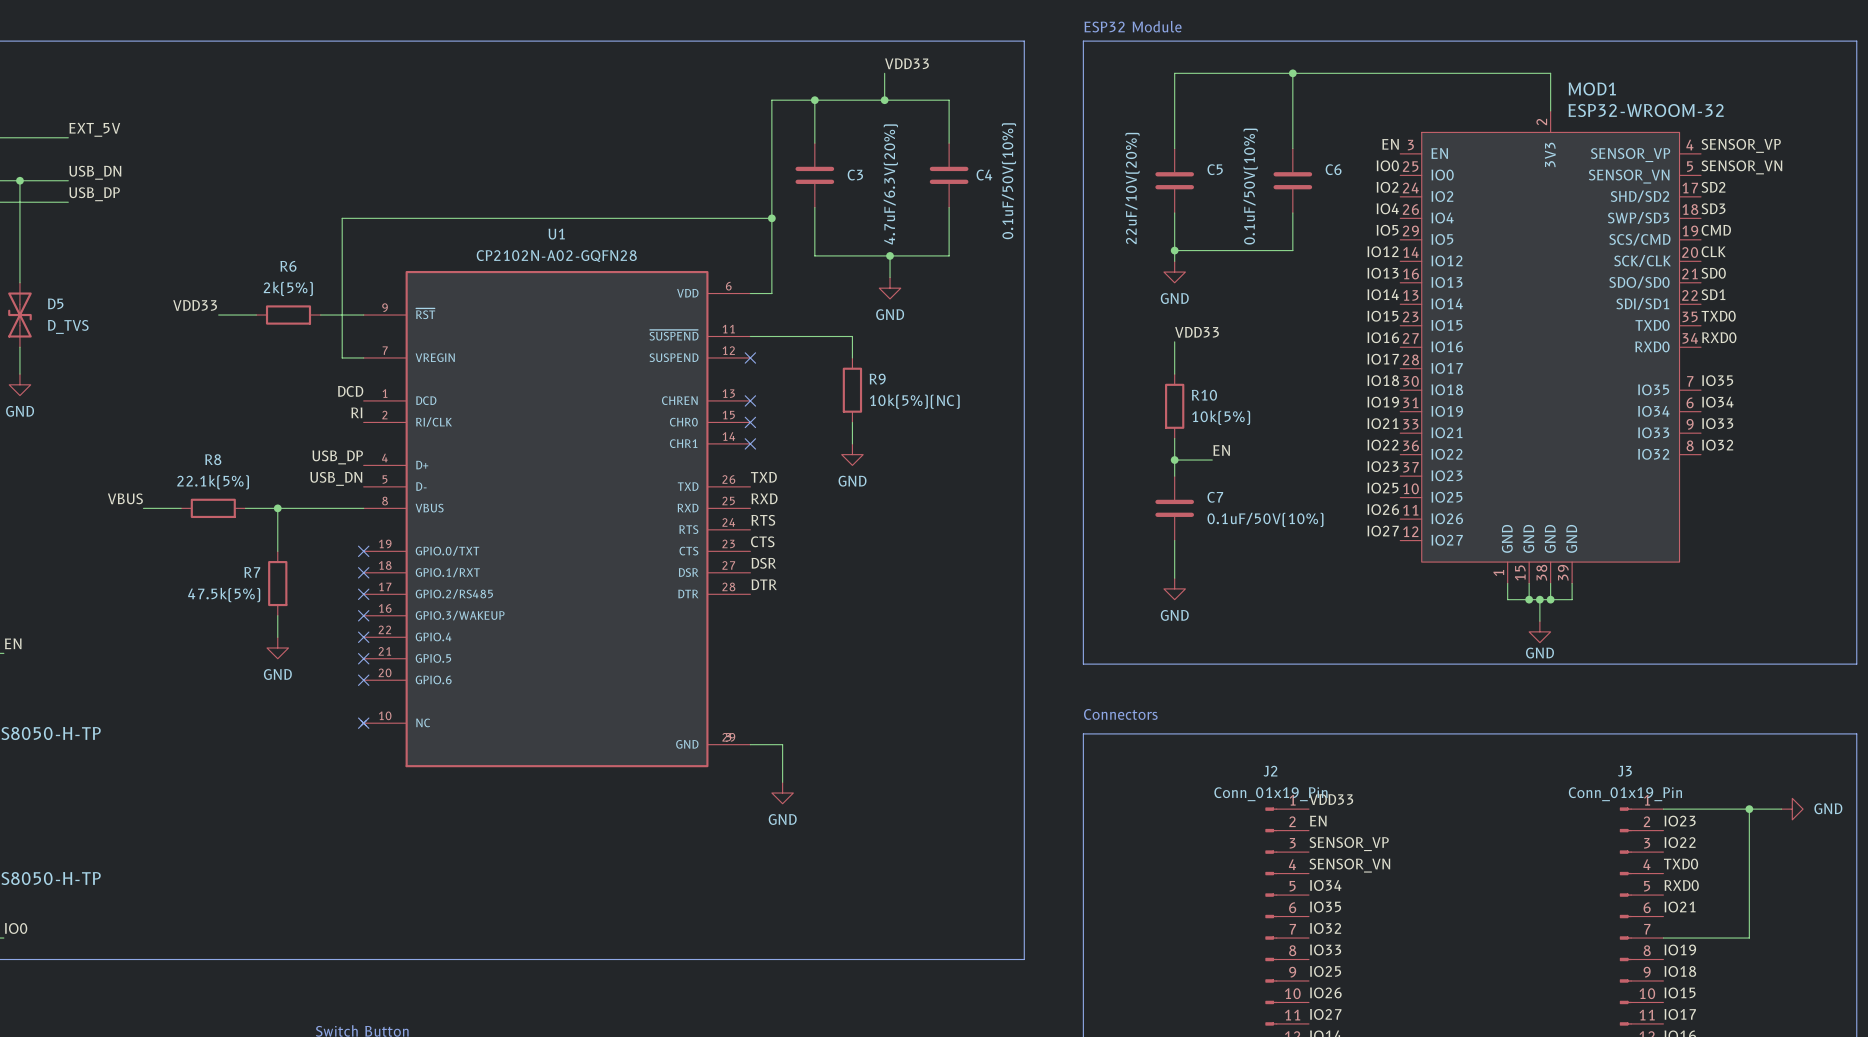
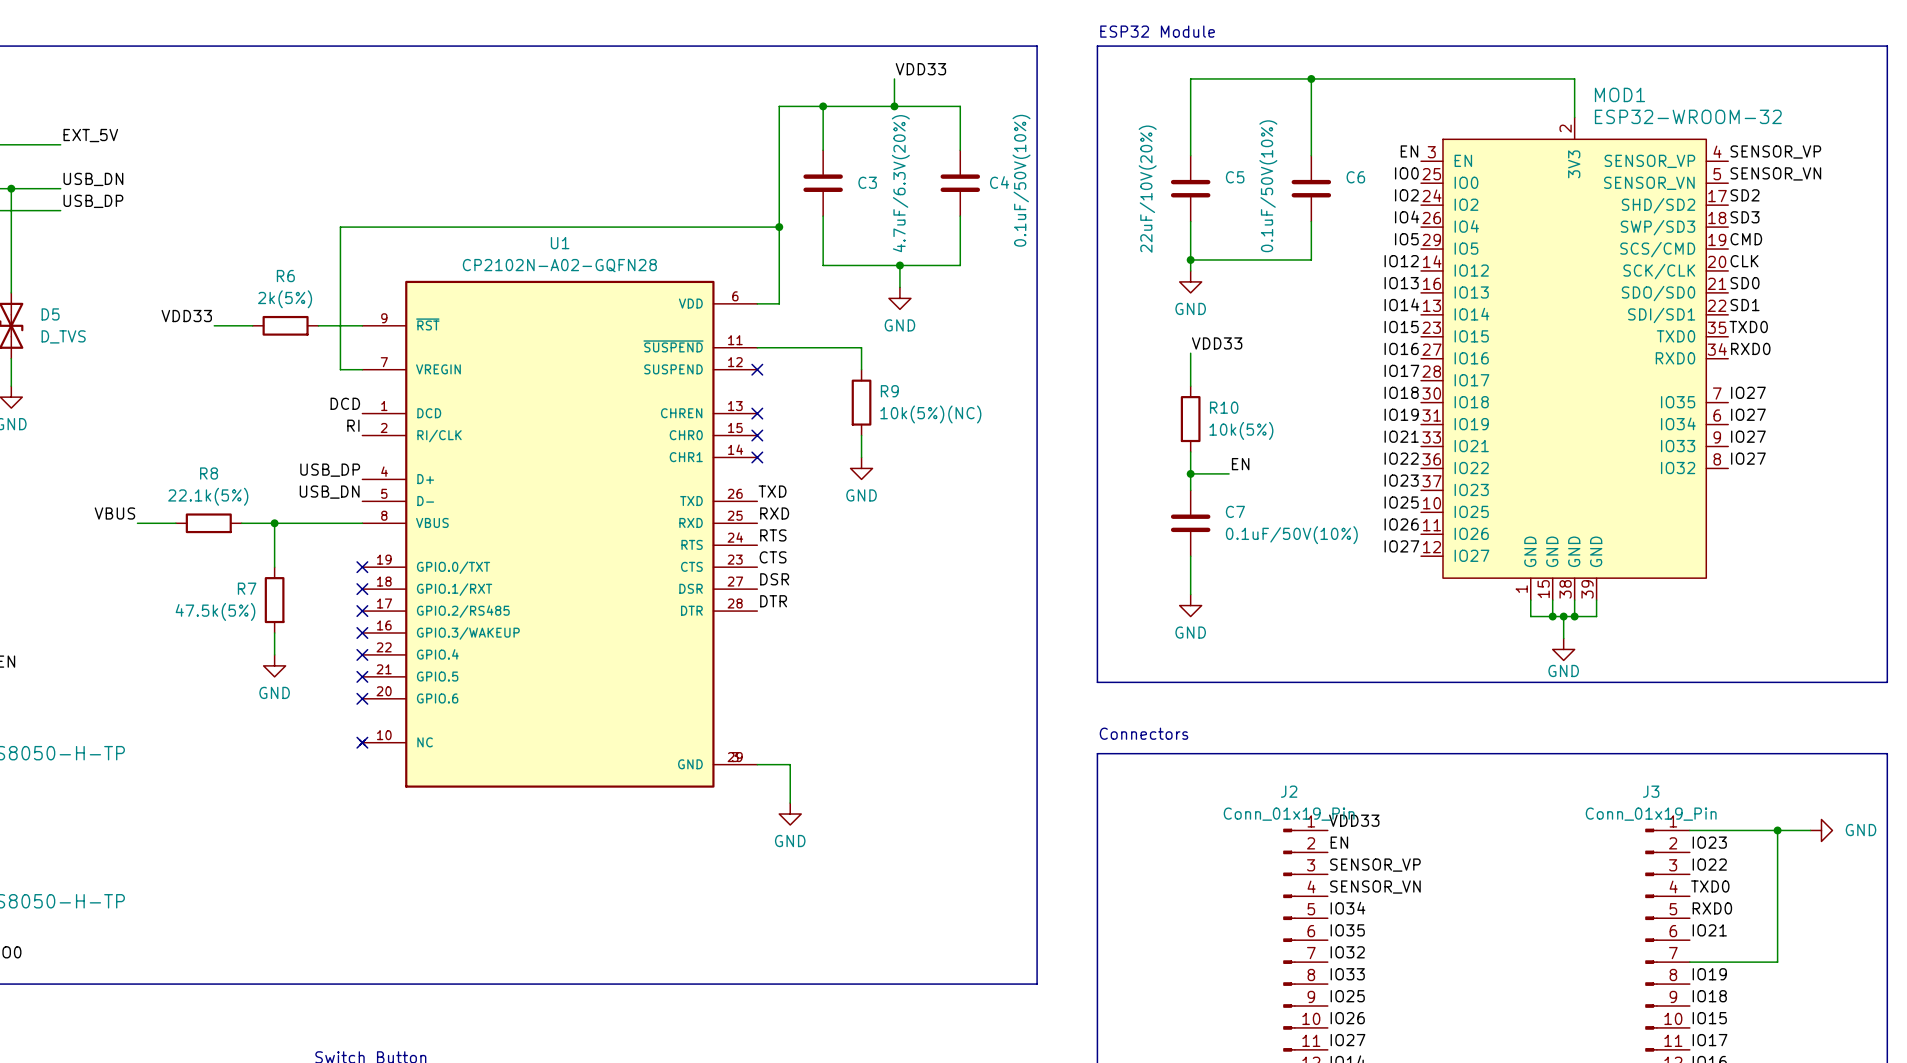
label: IO35 (1717, 380) -> IO27 (1748, 392)
label: IO34 (1717, 402) -> IO27 (1748, 414)
label: IO33 (1717, 423) -> IO27 (1748, 436)
label: IO32 (1717, 445) -> IO27 (1748, 458)

